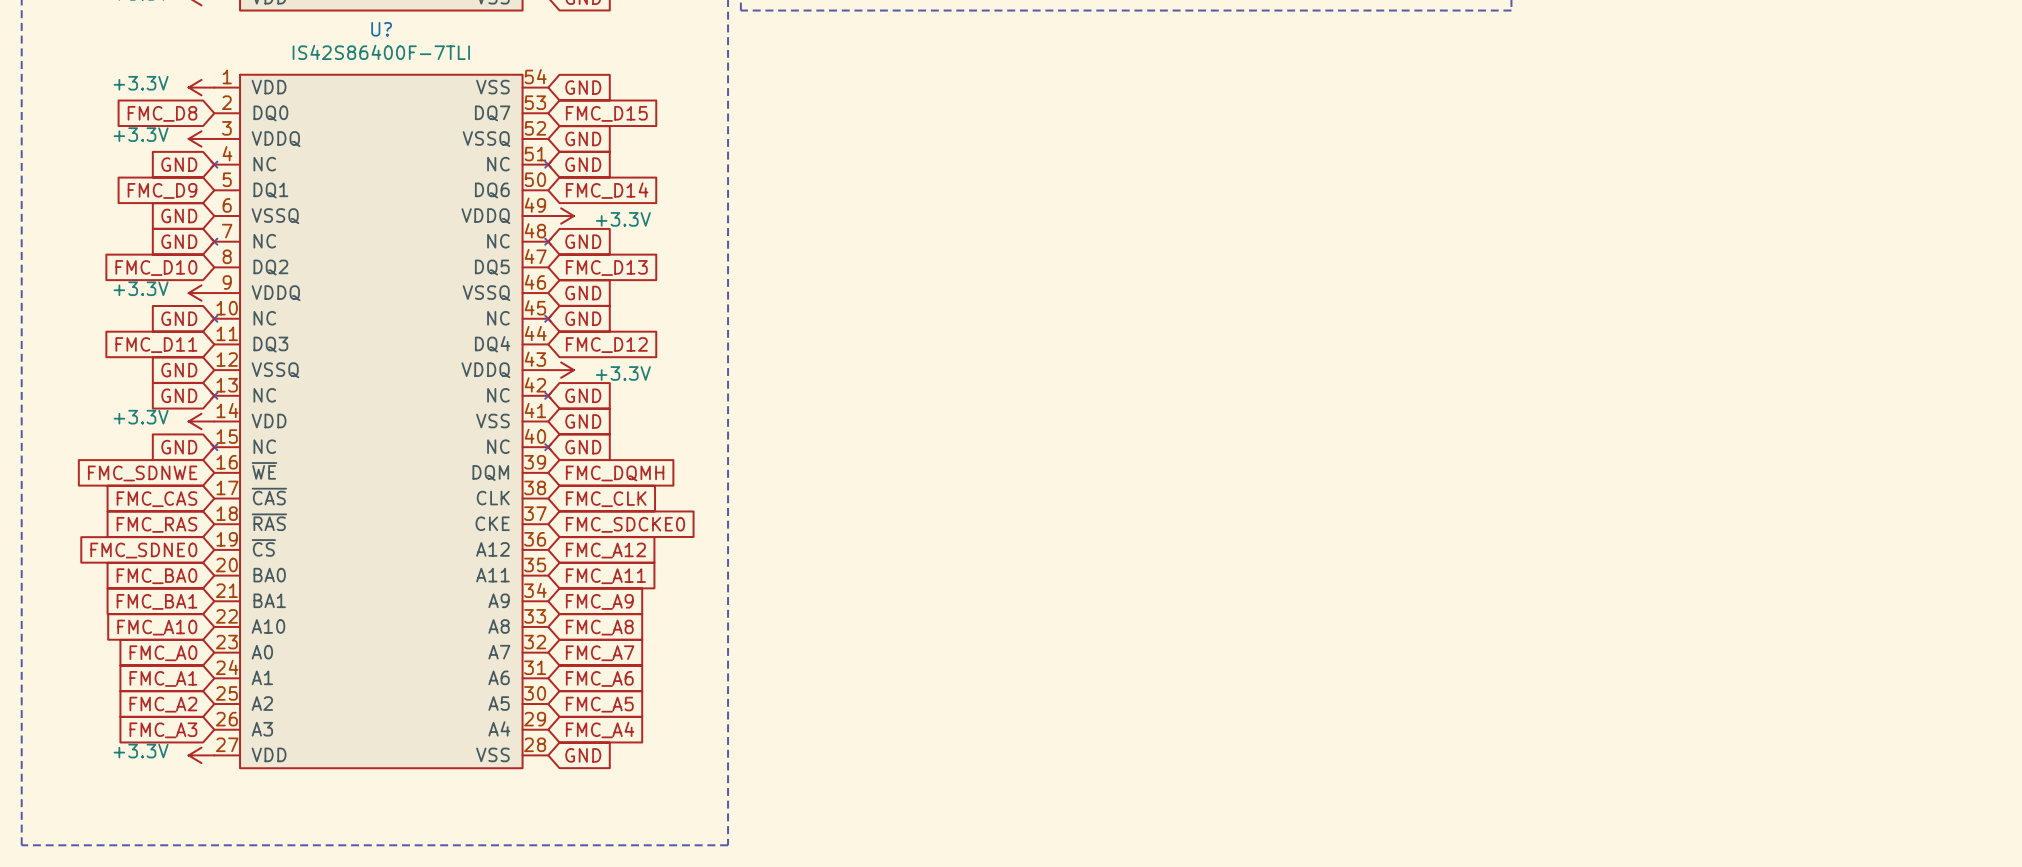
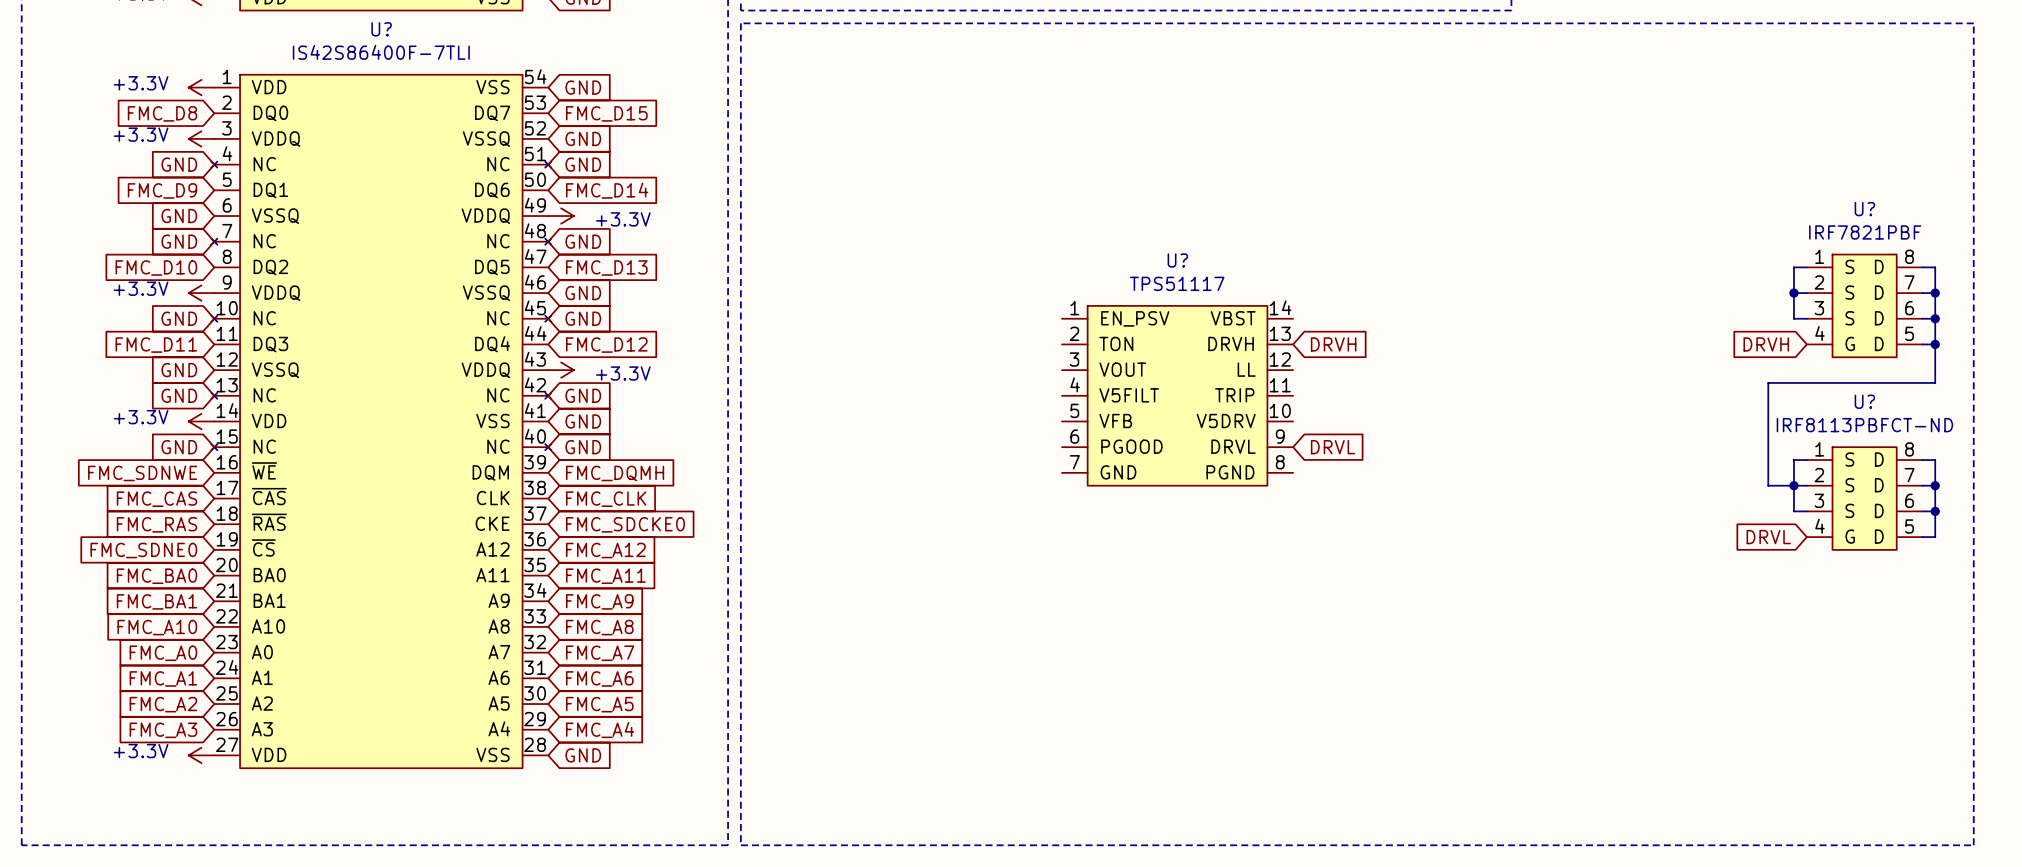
line: none -> (740, 23) (740, 845) (1973, 845) (1973, 23) (740, 23)
wire: none -> (1806, 267) (1793, 267) (1793, 318) (1806, 318)
wire: none -> (1922, 267) (1935, 267) (1935, 382) (1768, 382) (1768, 485) (1806, 485)
wire: none -> (1793, 293) (1806, 293)
junction: none -> (1793, 293)
wire: none -> (1922, 293) (1935, 293)
junction: none -> (1935, 293)
U?: none -> IRF7821PBF (1864, 305)
wire: none -> (1922, 318) (1935, 318)
junction: none -> (1935, 318)
global label: none -> DRVH (1333, 344)
global label: none -> DRVH (1766, 344)
wire: none -> (1922, 344) (1935, 344)
junction: none -> (1935, 344)
U?: none -> TPS51117 (1177, 395)
global label: none -> DRVL (1333, 447)
wire: none -> (1806, 460) (1793, 460) (1793, 511) (1806, 511)
wire: none -> (1922, 460) (1935, 460) (1935, 537) (1922, 537)
junction: none -> (1793, 485)
wire: none -> (1922, 485) (1935, 485)
junction: none -> (1935, 485)
U?: none -> IRF8113PBFCT-ND (1864, 498)
wire: none -> (1922, 511) (1935, 511)
junction: none -> (1935, 511)
global label: none -> DRVL (1768, 537)

